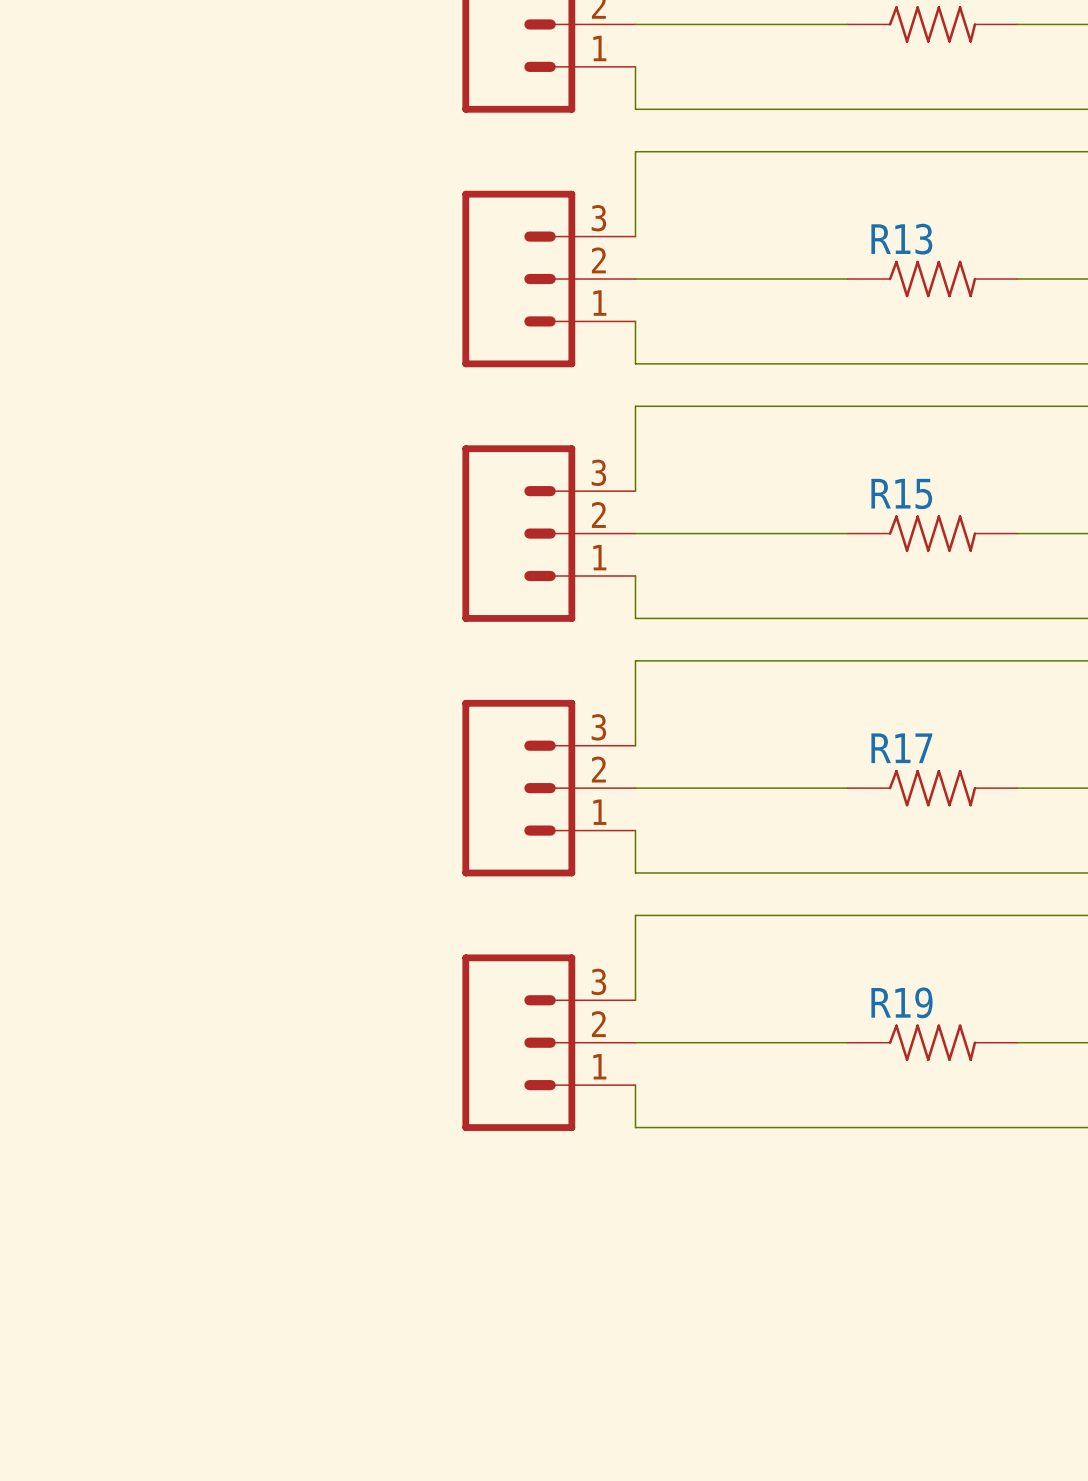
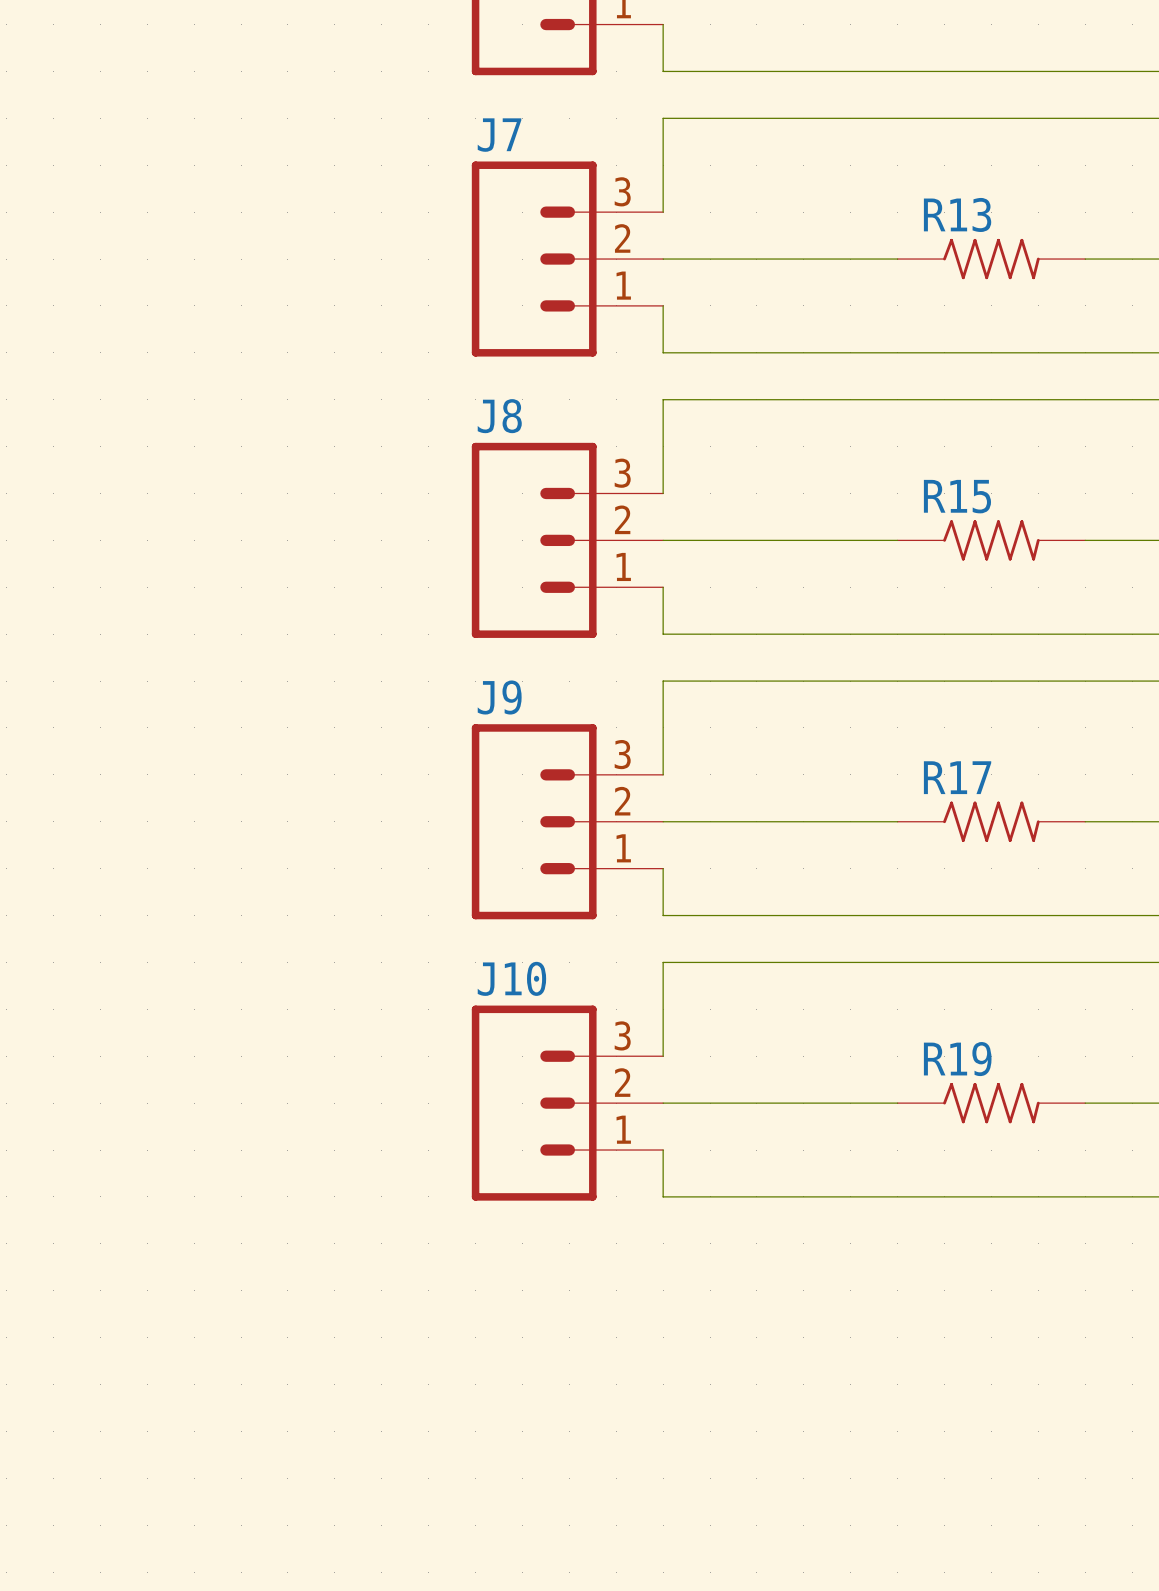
J7 name: none -> J7 (499, 135)
J8 name: none -> J8 (499, 416)
J9 name: none -> J9 (499, 697)
J10 name: none -> J10 (511, 978)

